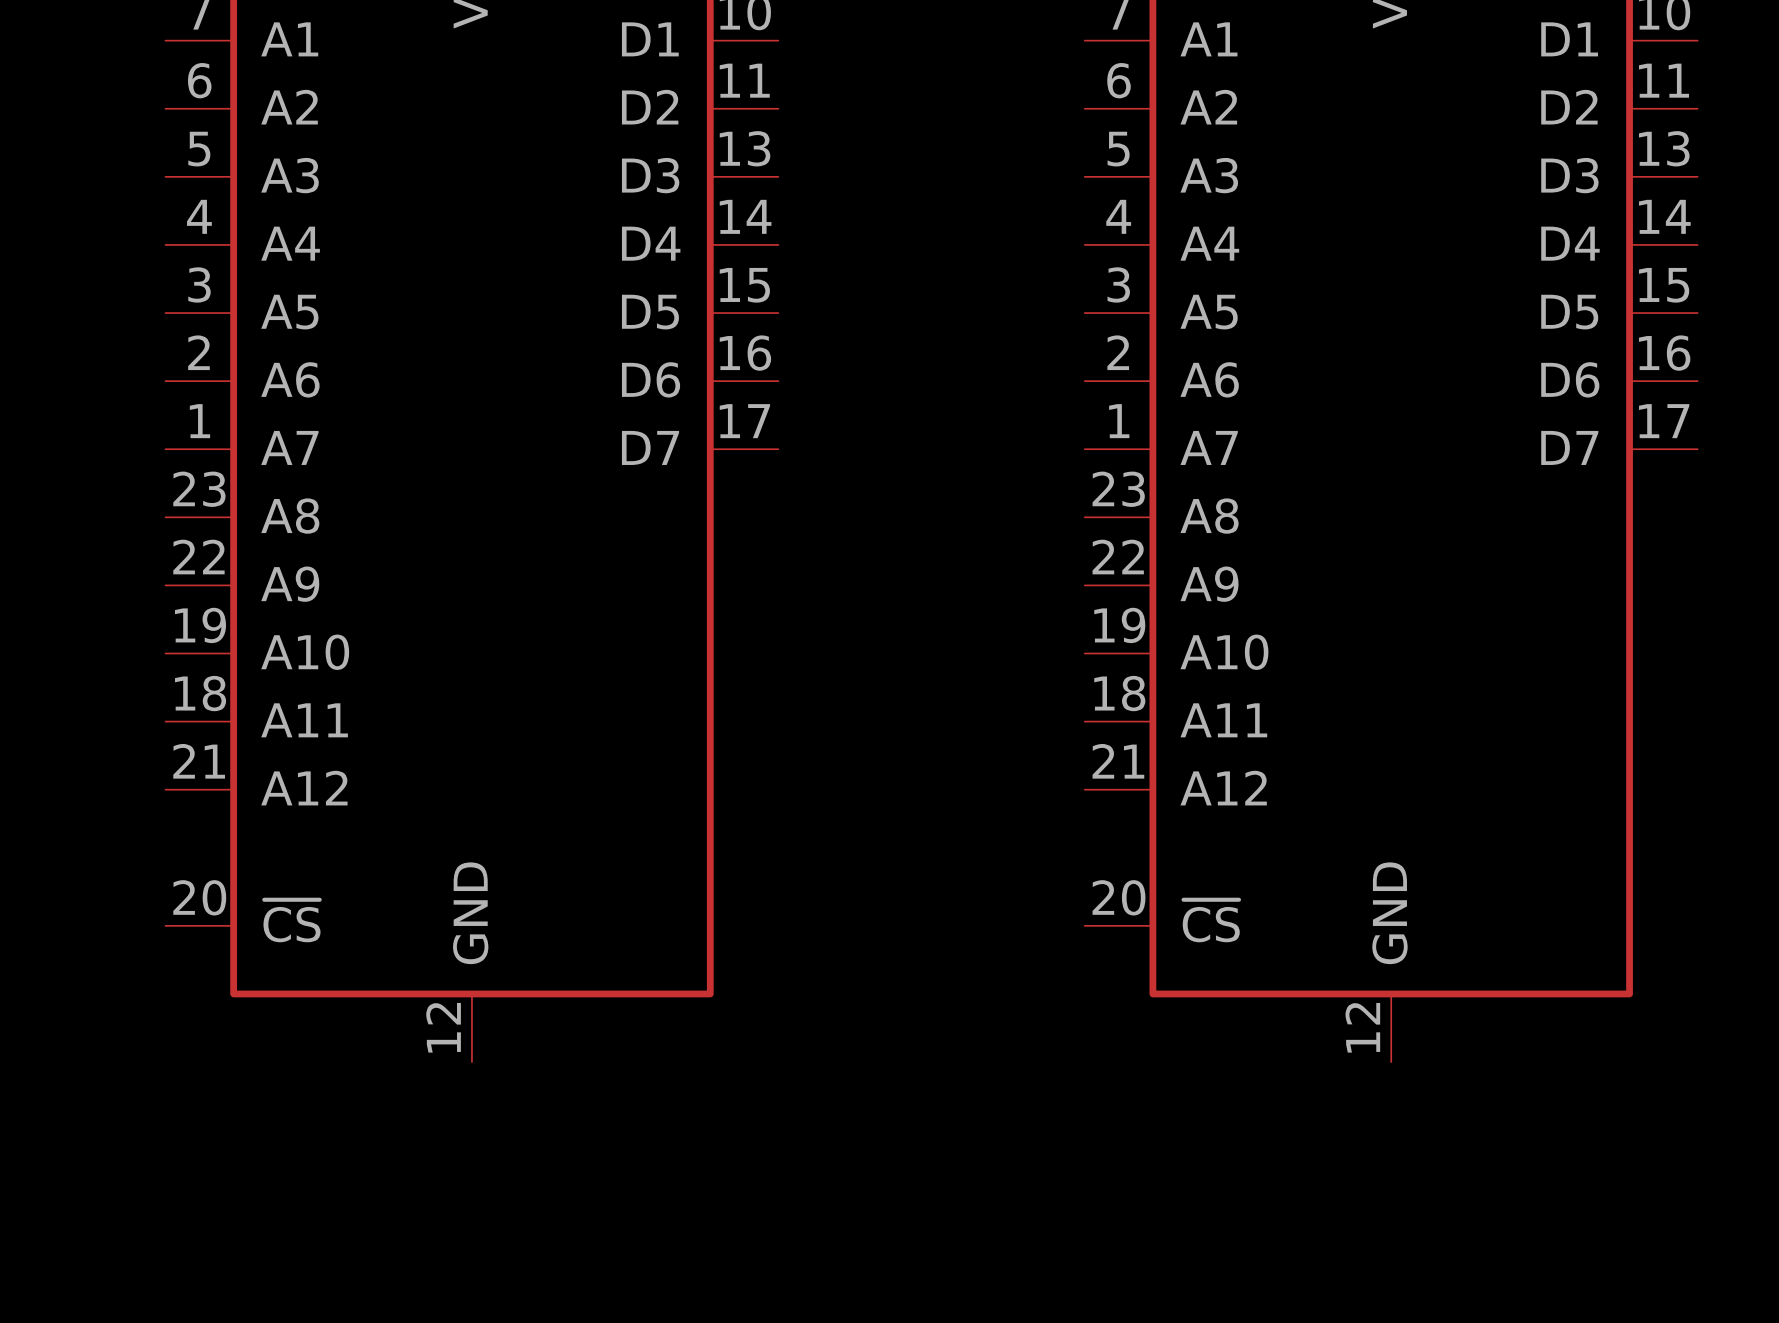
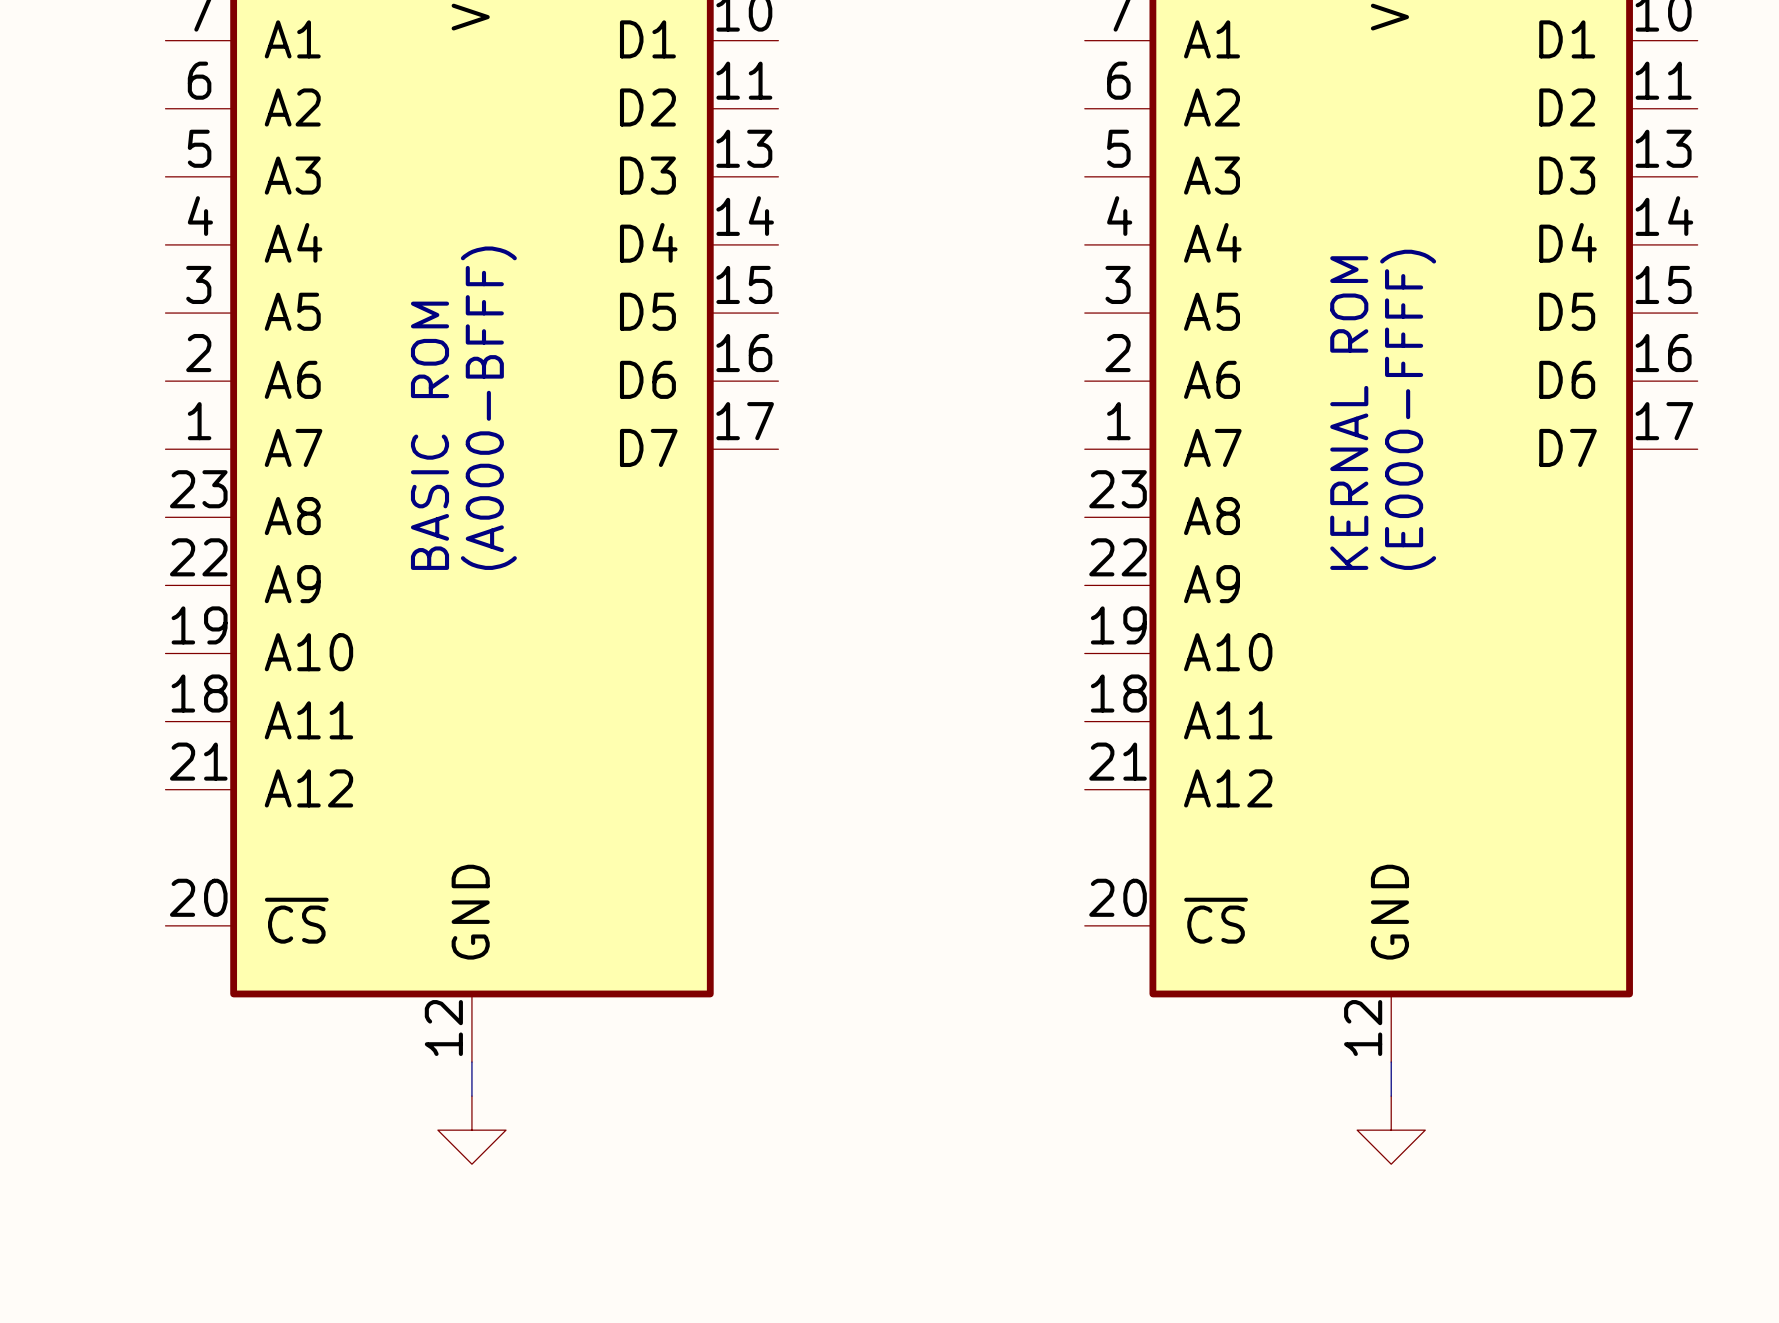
text: none -> KERNAL ROM (1349, 413)
text: none -> (A000-BFFF) (488, 408)
text: none -> (E000-FFFF) (1408, 409)
text: none -> BASIC ROM (430, 435)
wire: none -> (471, 1062) (471, 1096)
wire: none -> (1391, 1062) (1391, 1096)
power symbol: none -> (471, 1130)
power symbol: none -> (1391, 1130)

